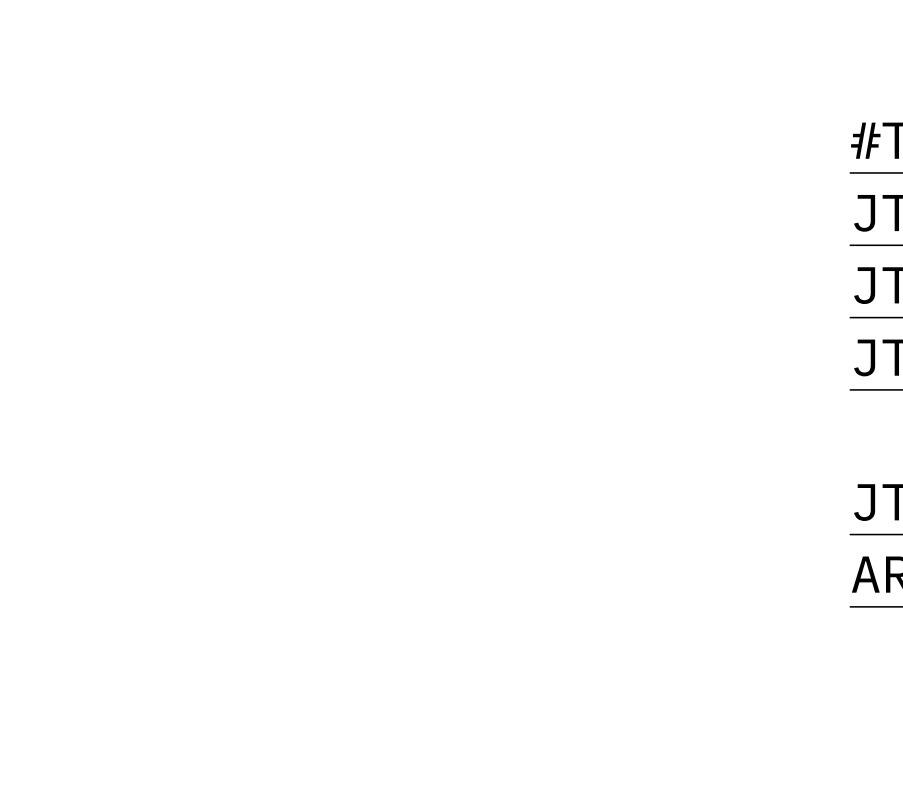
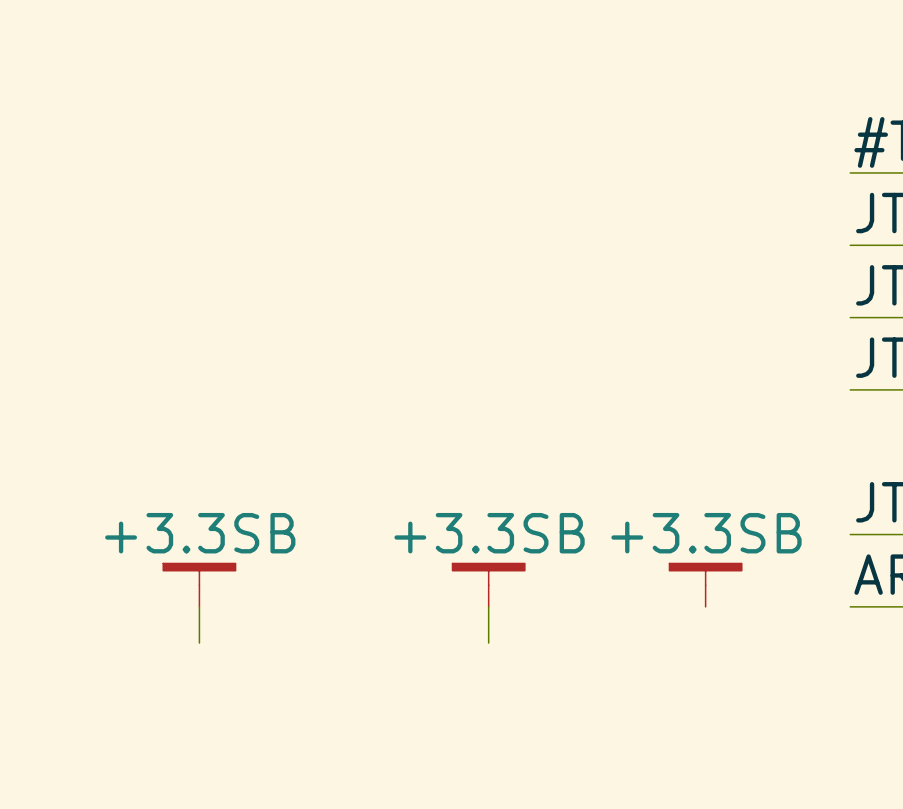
power symbol: none -> +3.3SB (199, 585)
power symbol: none -> +3.3SB (488, 585)
power symbol: none -> +3.3SB (705, 585)
wire: none -> (199, 606) (199, 643)
wire: none -> (488, 606) (488, 643)

